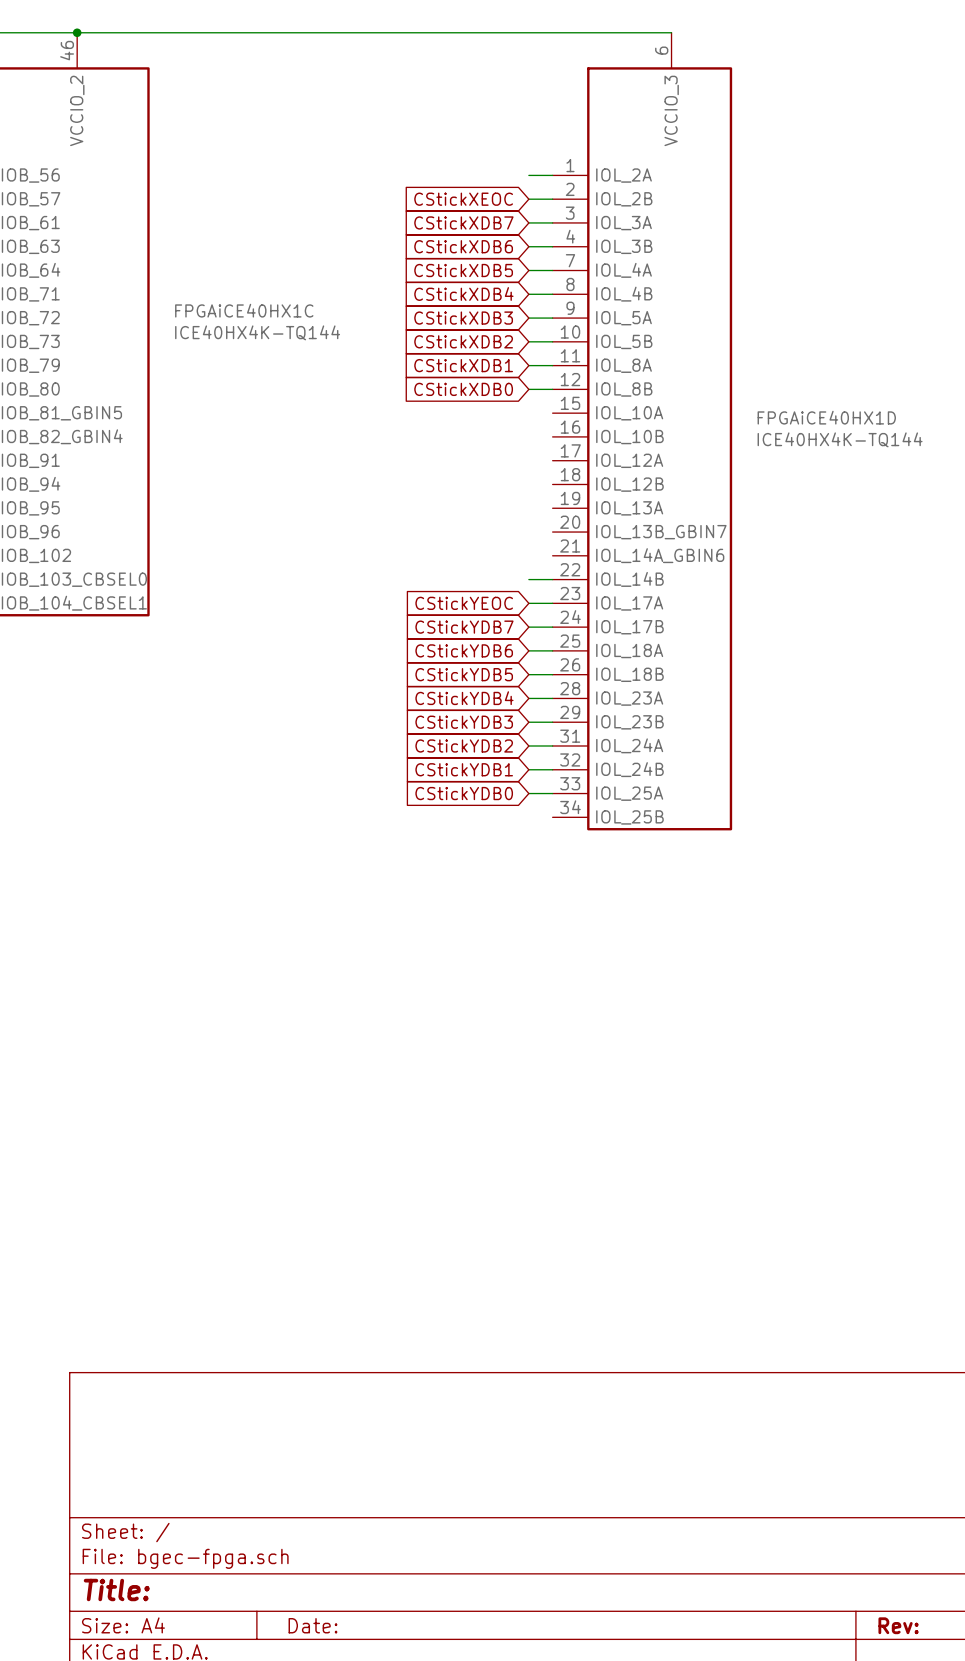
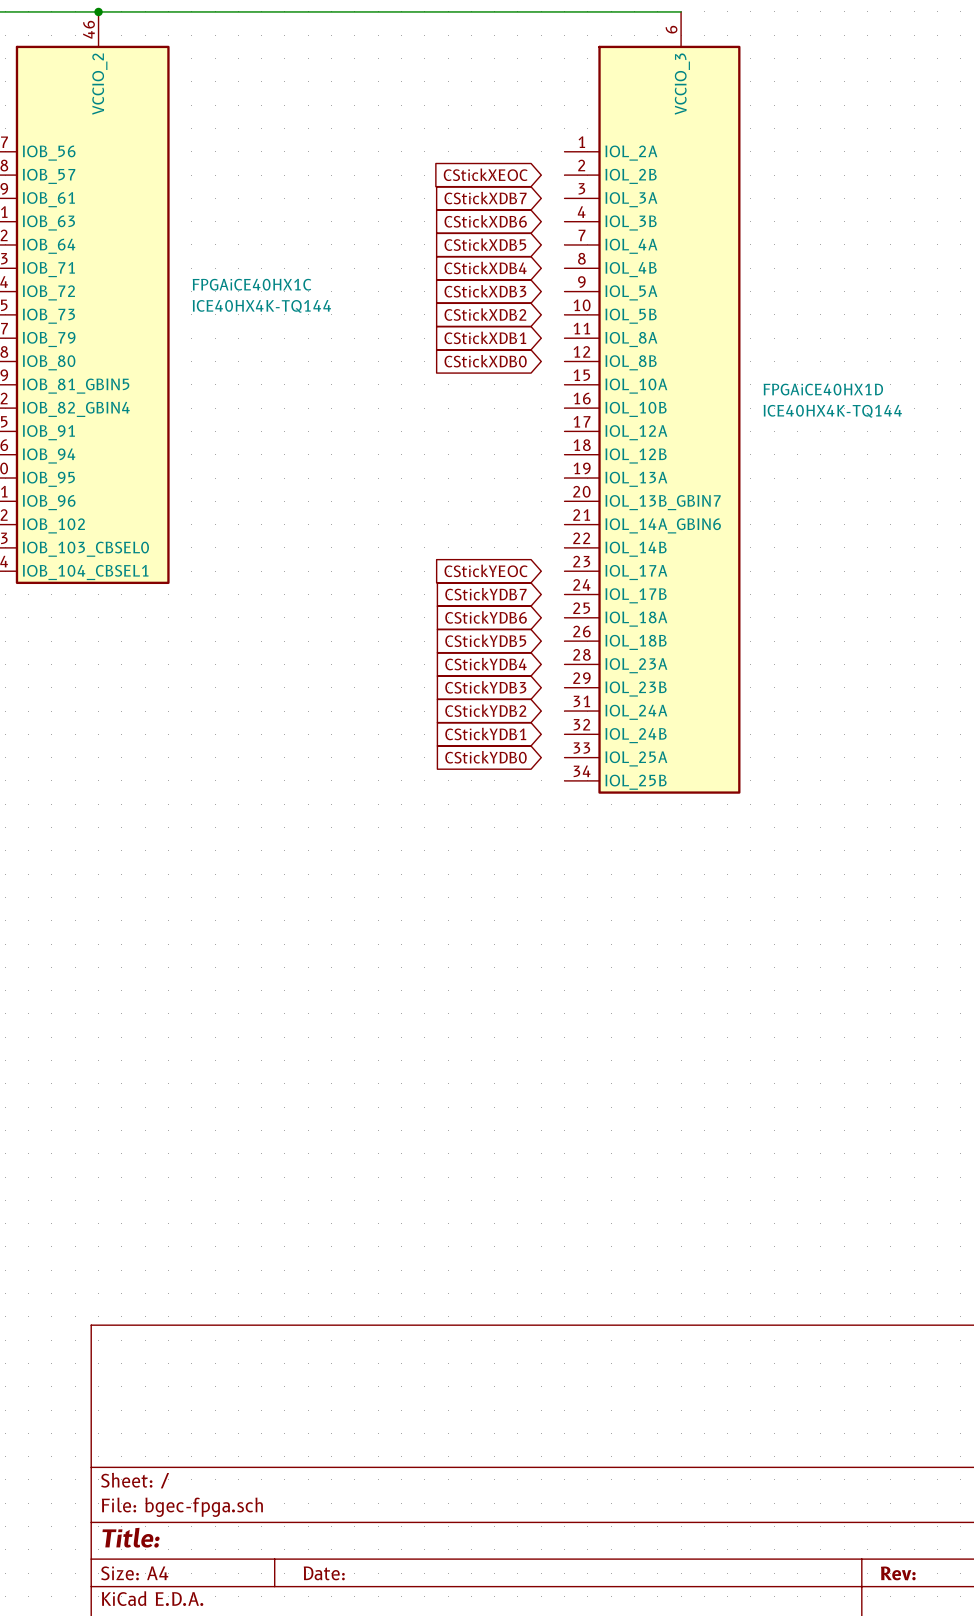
wire: (528, 175) (552, 175) -> none
wire: (528, 199) (552, 199) -> none
wire: (528, 222) (552, 222) -> none
wire: (528, 246) (552, 246) -> none
wire: (528, 270) (552, 270) -> none
wire: (528, 294) (552, 294) -> none
wire: (528, 318) (552, 318) -> none
wire: (528, 341) (552, 341) -> none
wire: (528, 365) (552, 365) -> none
wire: (528, 389) (552, 389) -> none
wire: (528, 579) (552, 579) -> none
wire: (528, 603) (552, 603) -> none
wire: (528, 627) (552, 627) -> none
wire: (528, 650) (552, 650) -> none
wire: (528, 674) (552, 674) -> none
wire: (528, 698) (552, 698) -> none
wire: (528, 722) (552, 722) -> none
wire: (528, 745) (552, 745) -> none
wire: (528, 769) (552, 769) -> none
wire: (528, 793) (552, 793) -> none

